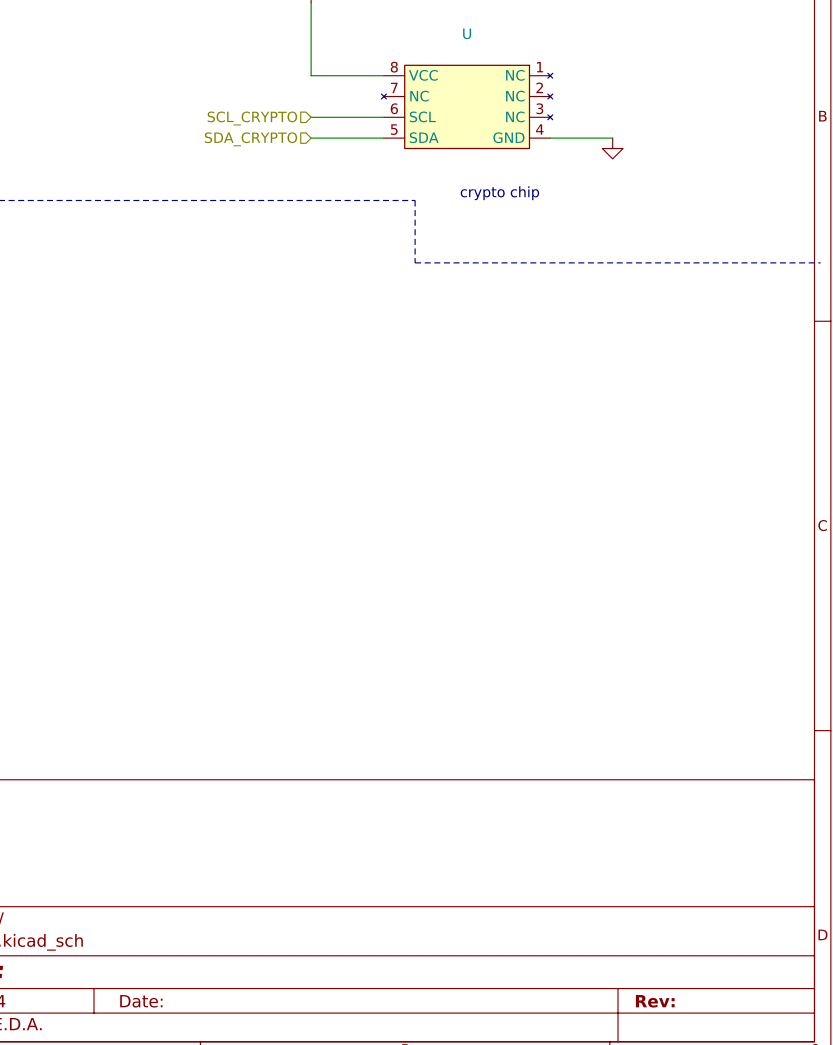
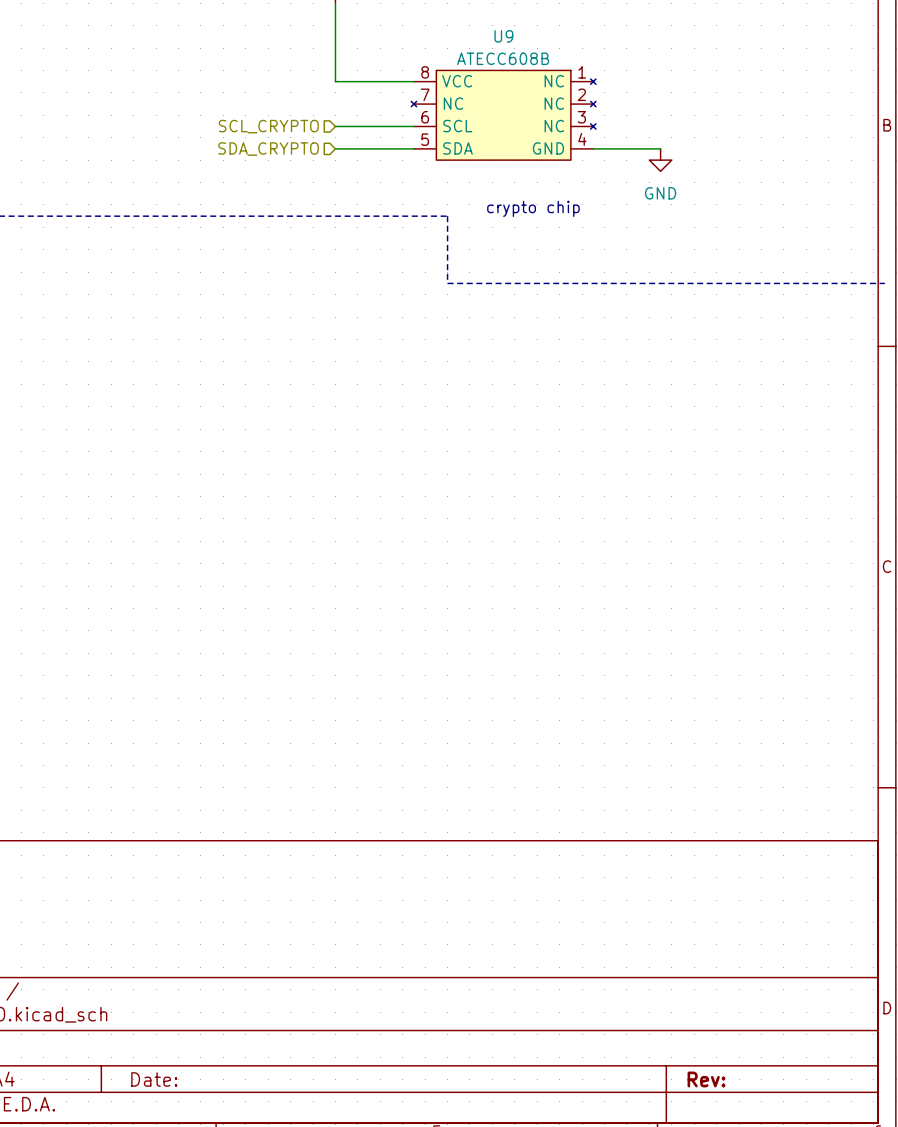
U name: U (467, 33) -> U9 (503, 36)
U value: none -> ATECC608B (503, 58)
power symbol text: none -> GND (660, 193)

